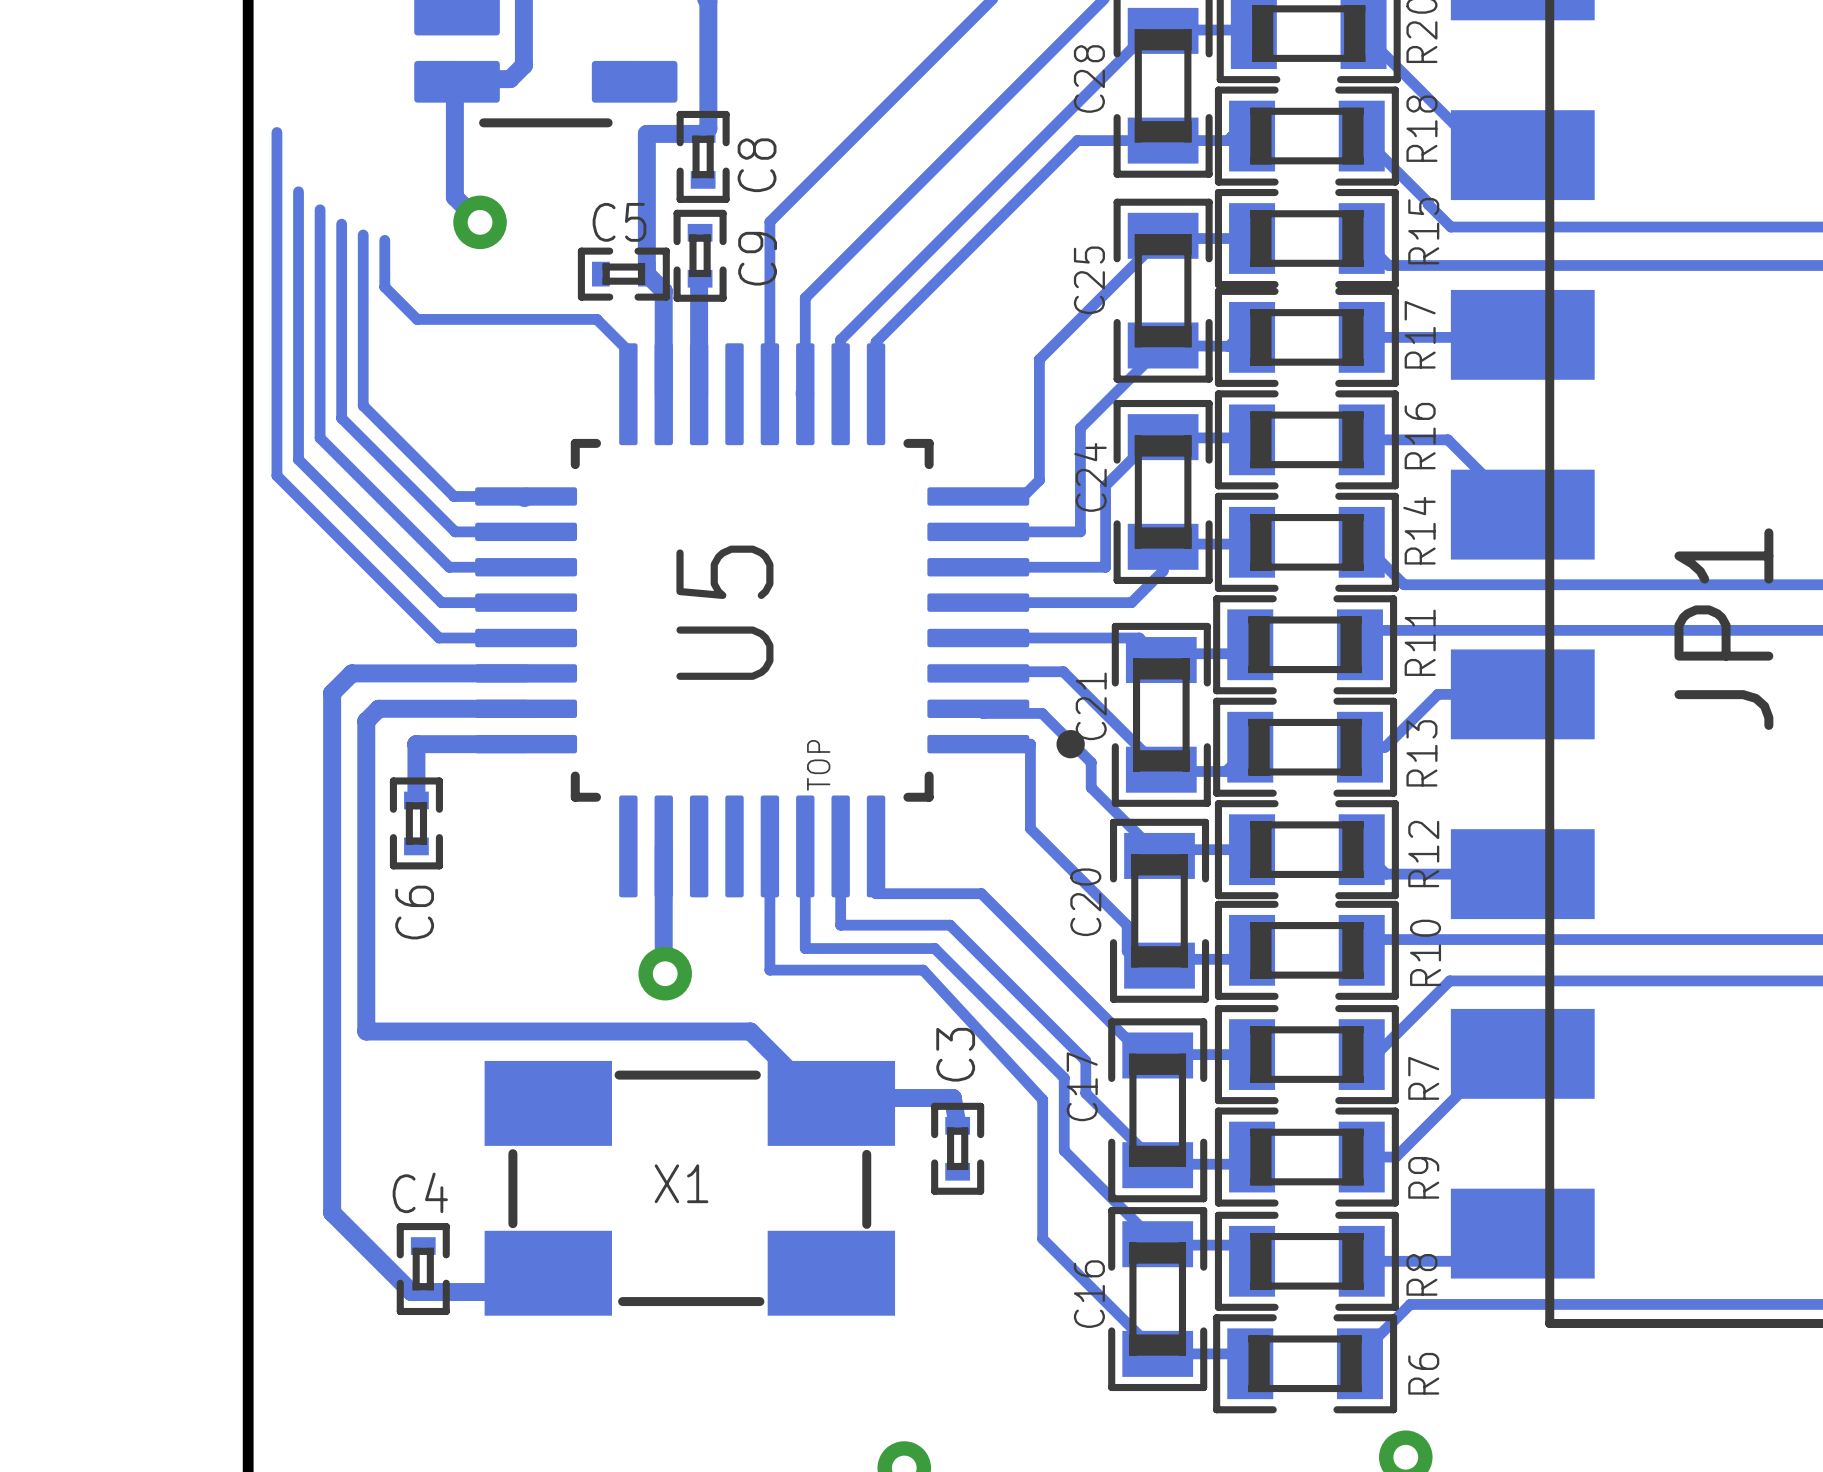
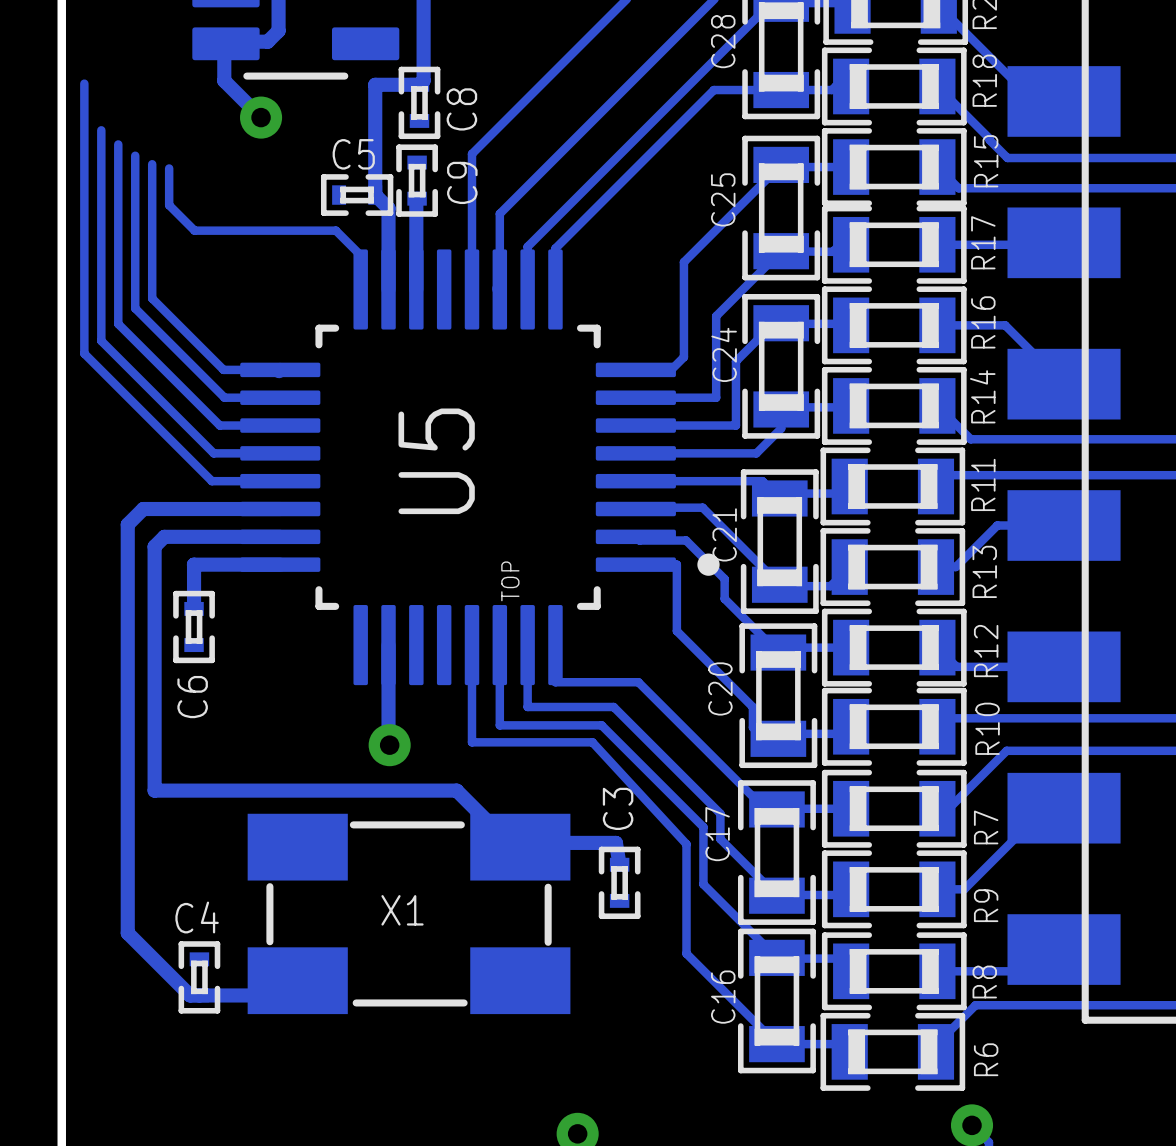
track: (454, 128) (454, 197) (480, 222) -> (224, 80) (261, 117)
via position: (480, 222) -> (261, 117)

